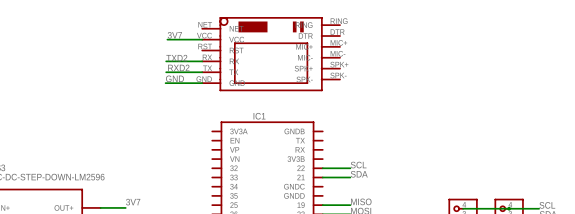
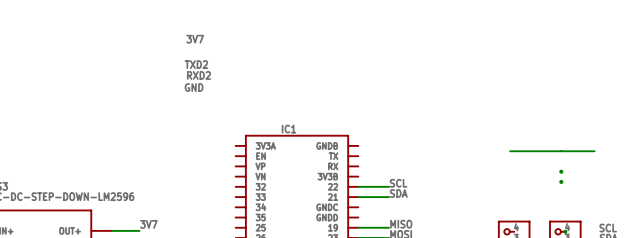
wire: (167, 39) (202, 39) -> none
part: (271, 54) -> none
wire: (166, 61) (202, 61) -> none
wire: (166, 72) (202, 72) -> none
wire: (165, 83) (202, 83) -> none
junction: none -> (561, 171)
junction: none -> (561, 181)
wire: (463, 208) (539, 208) -> (510, 151) (594, 151)

